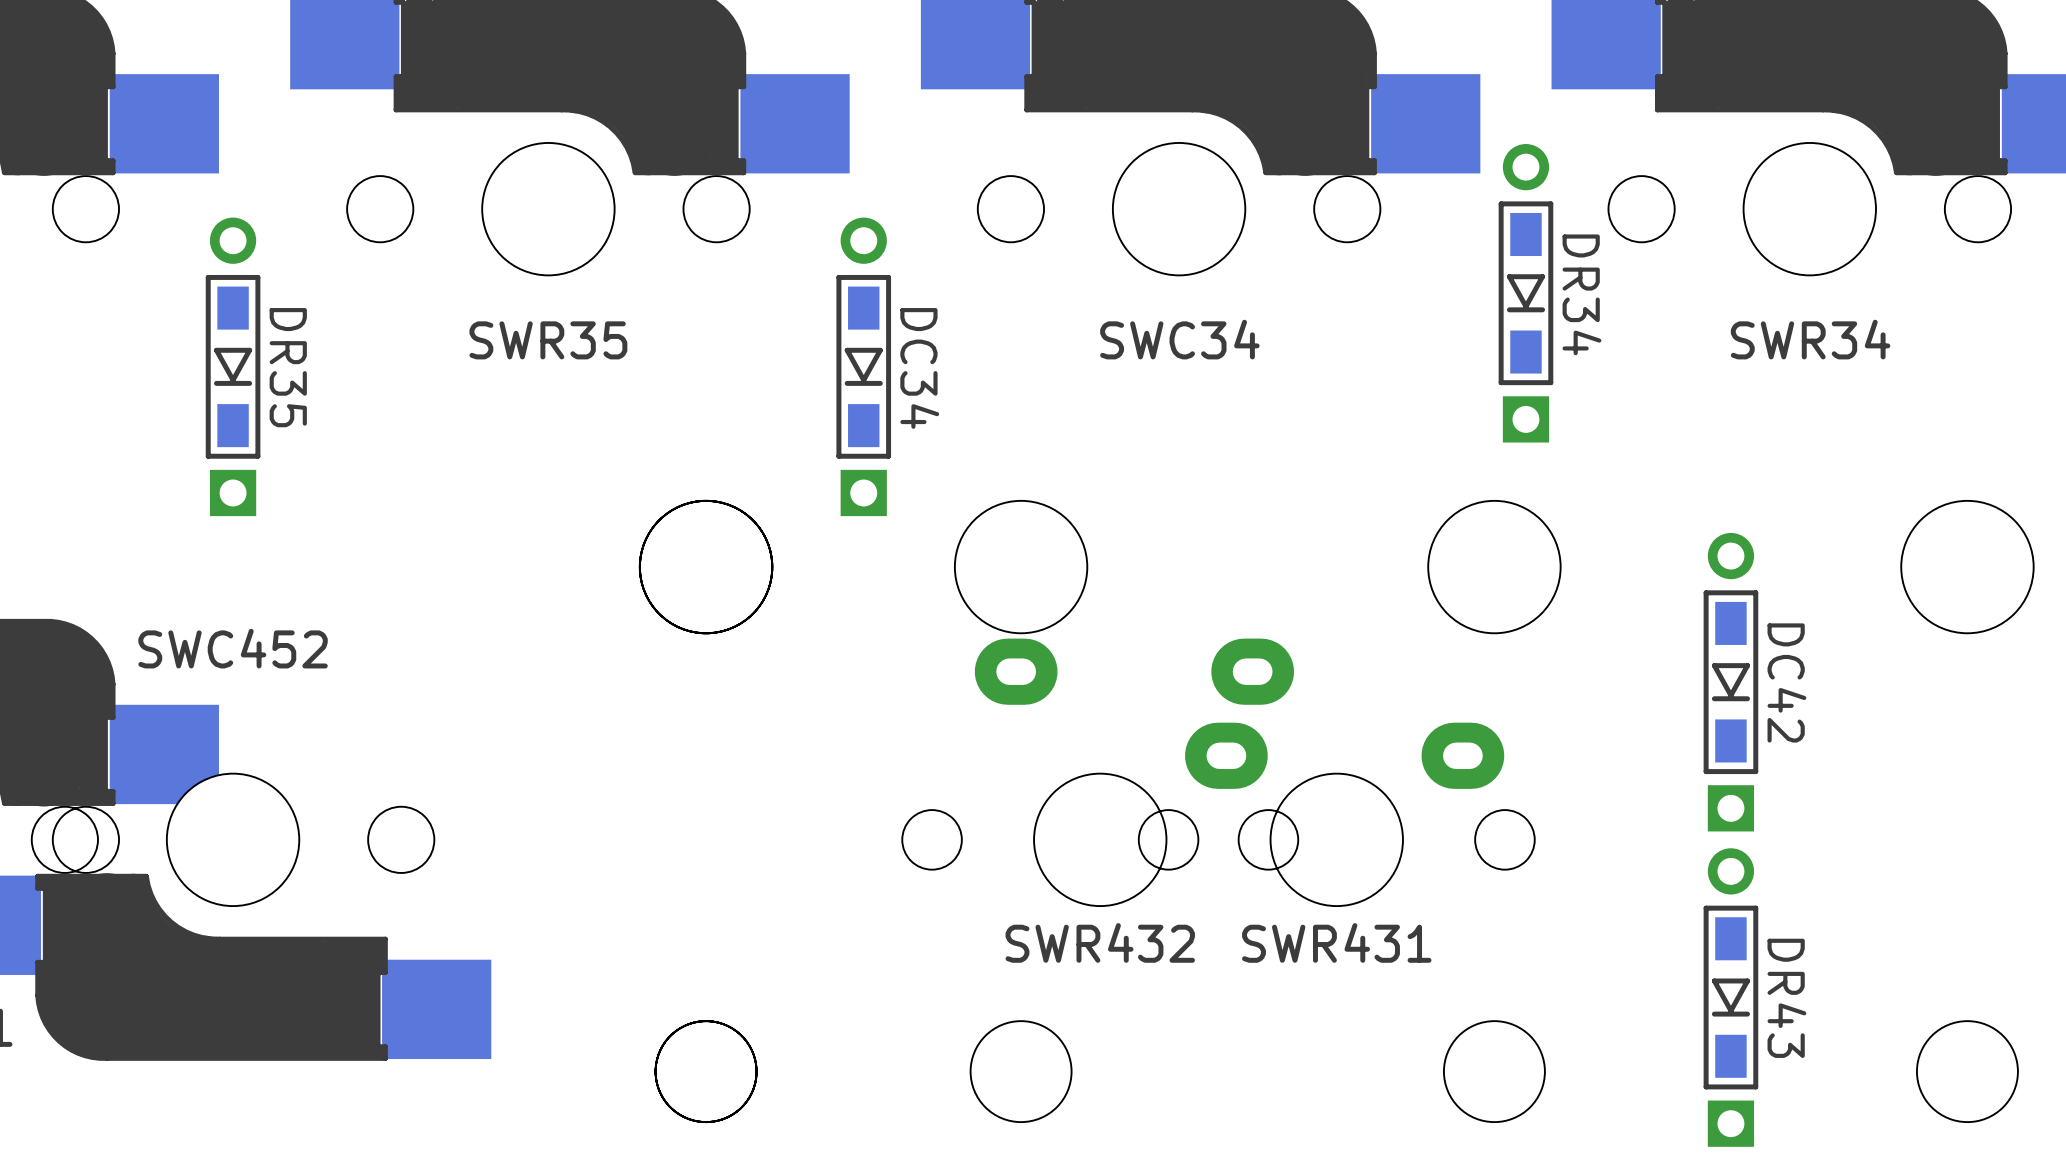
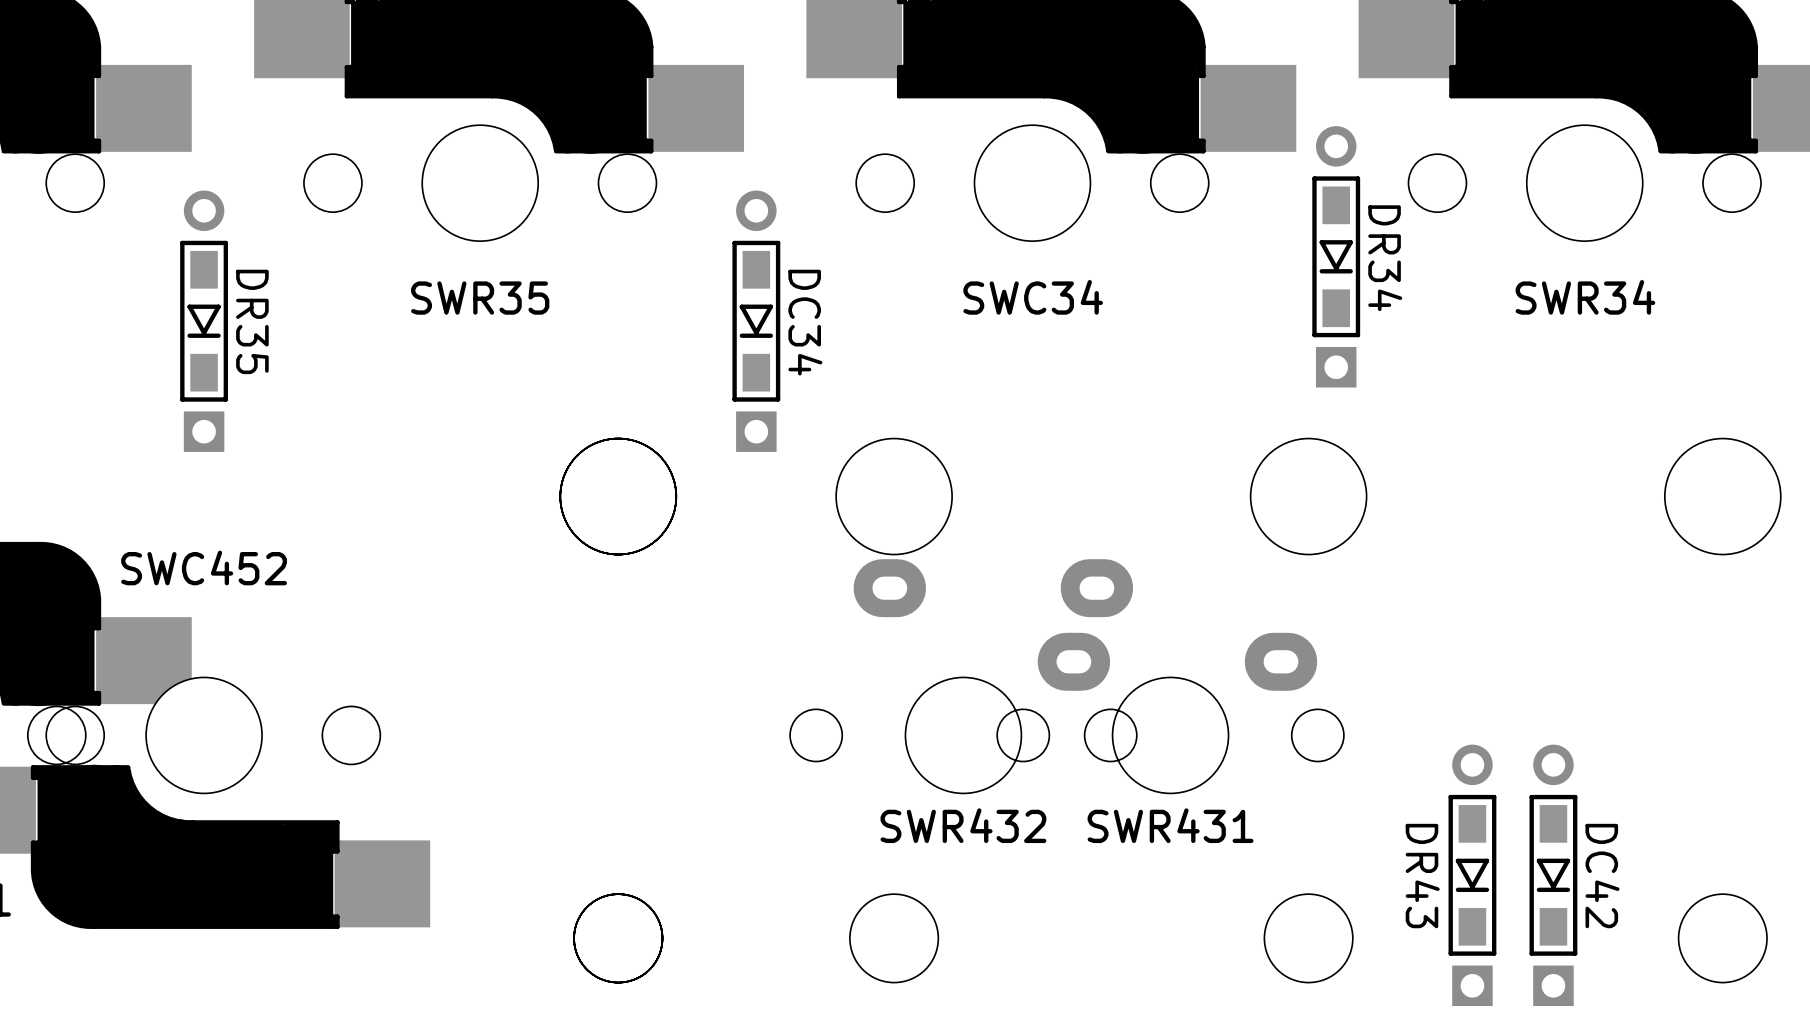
DC42 position: (1730, 682) -> (1553, 875)
DR43 position: (1730, 997) -> (1472, 875)
DR43 name position: DR43 (1786, 998) -> DR43 (1422, 876)

